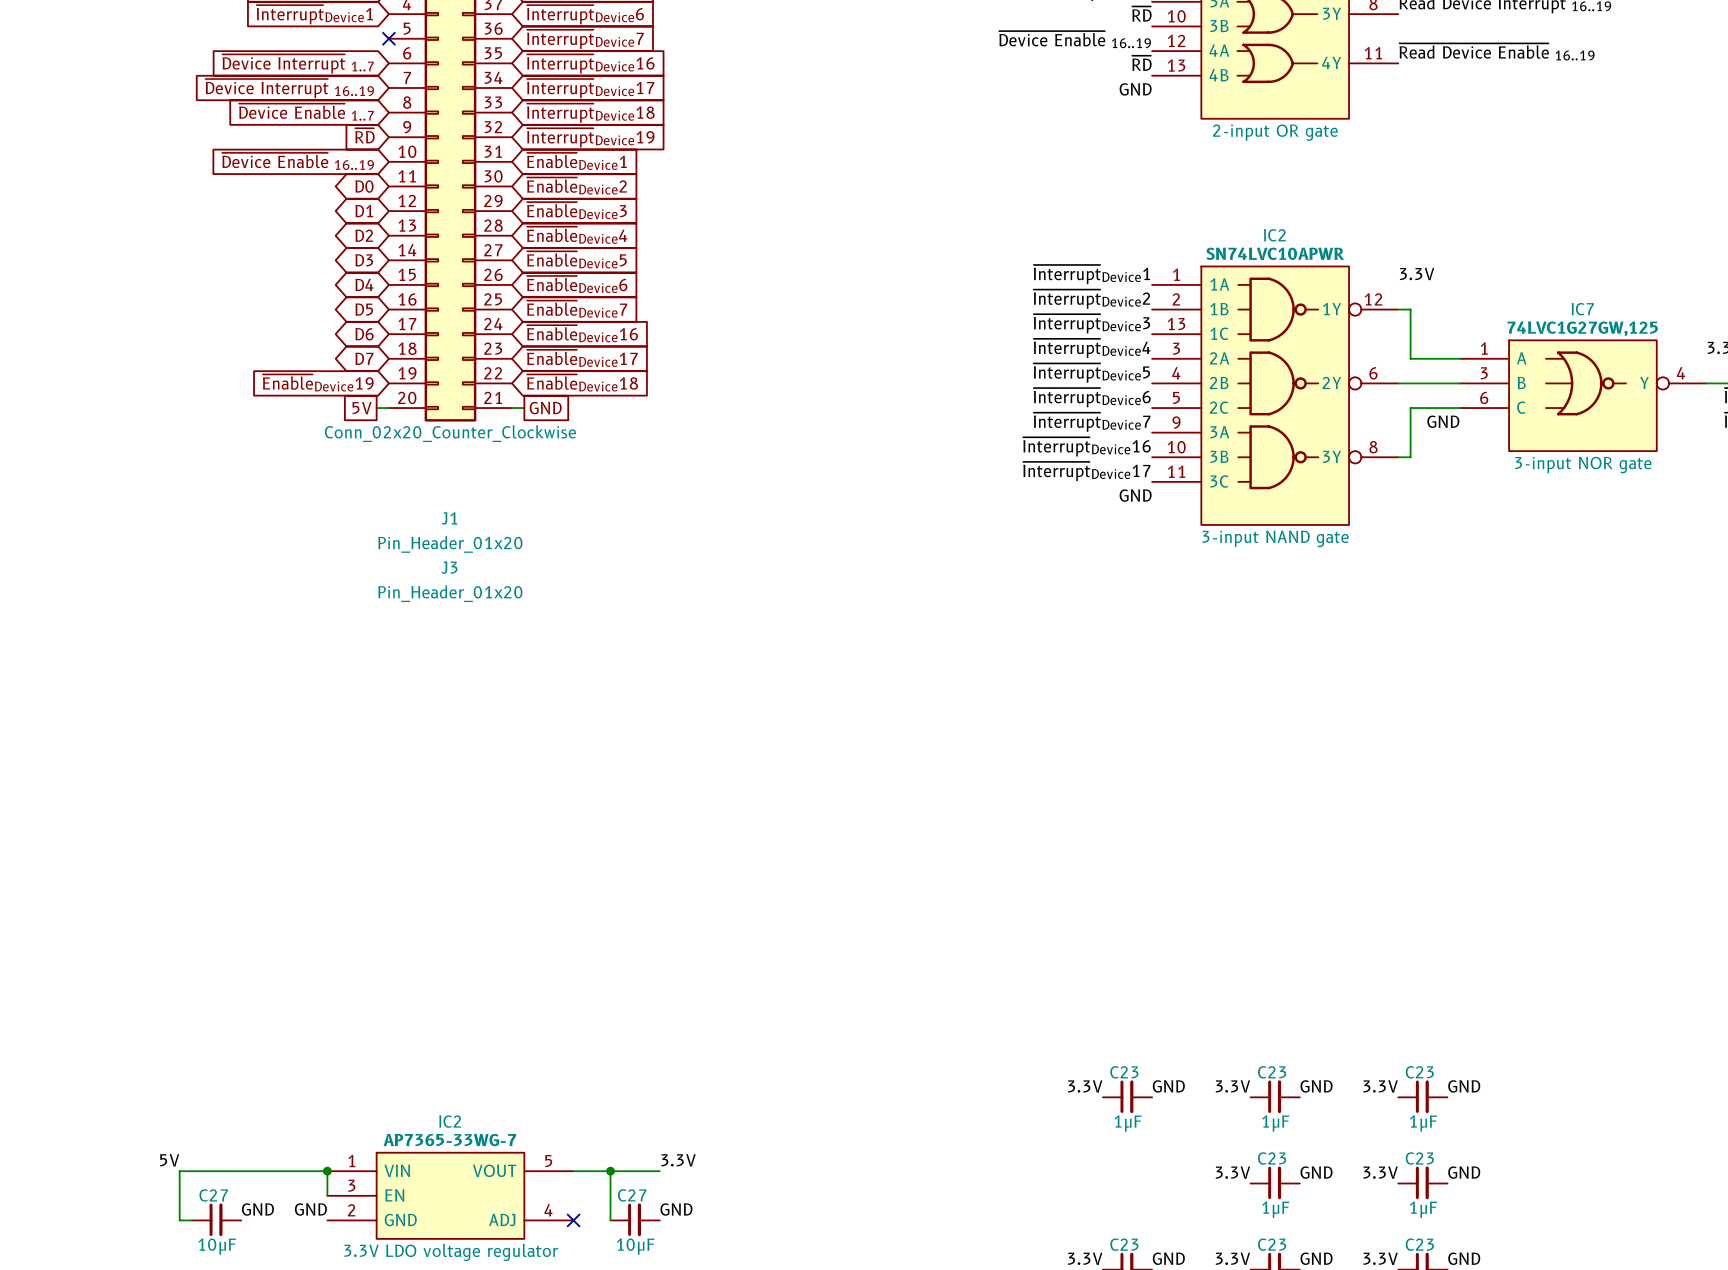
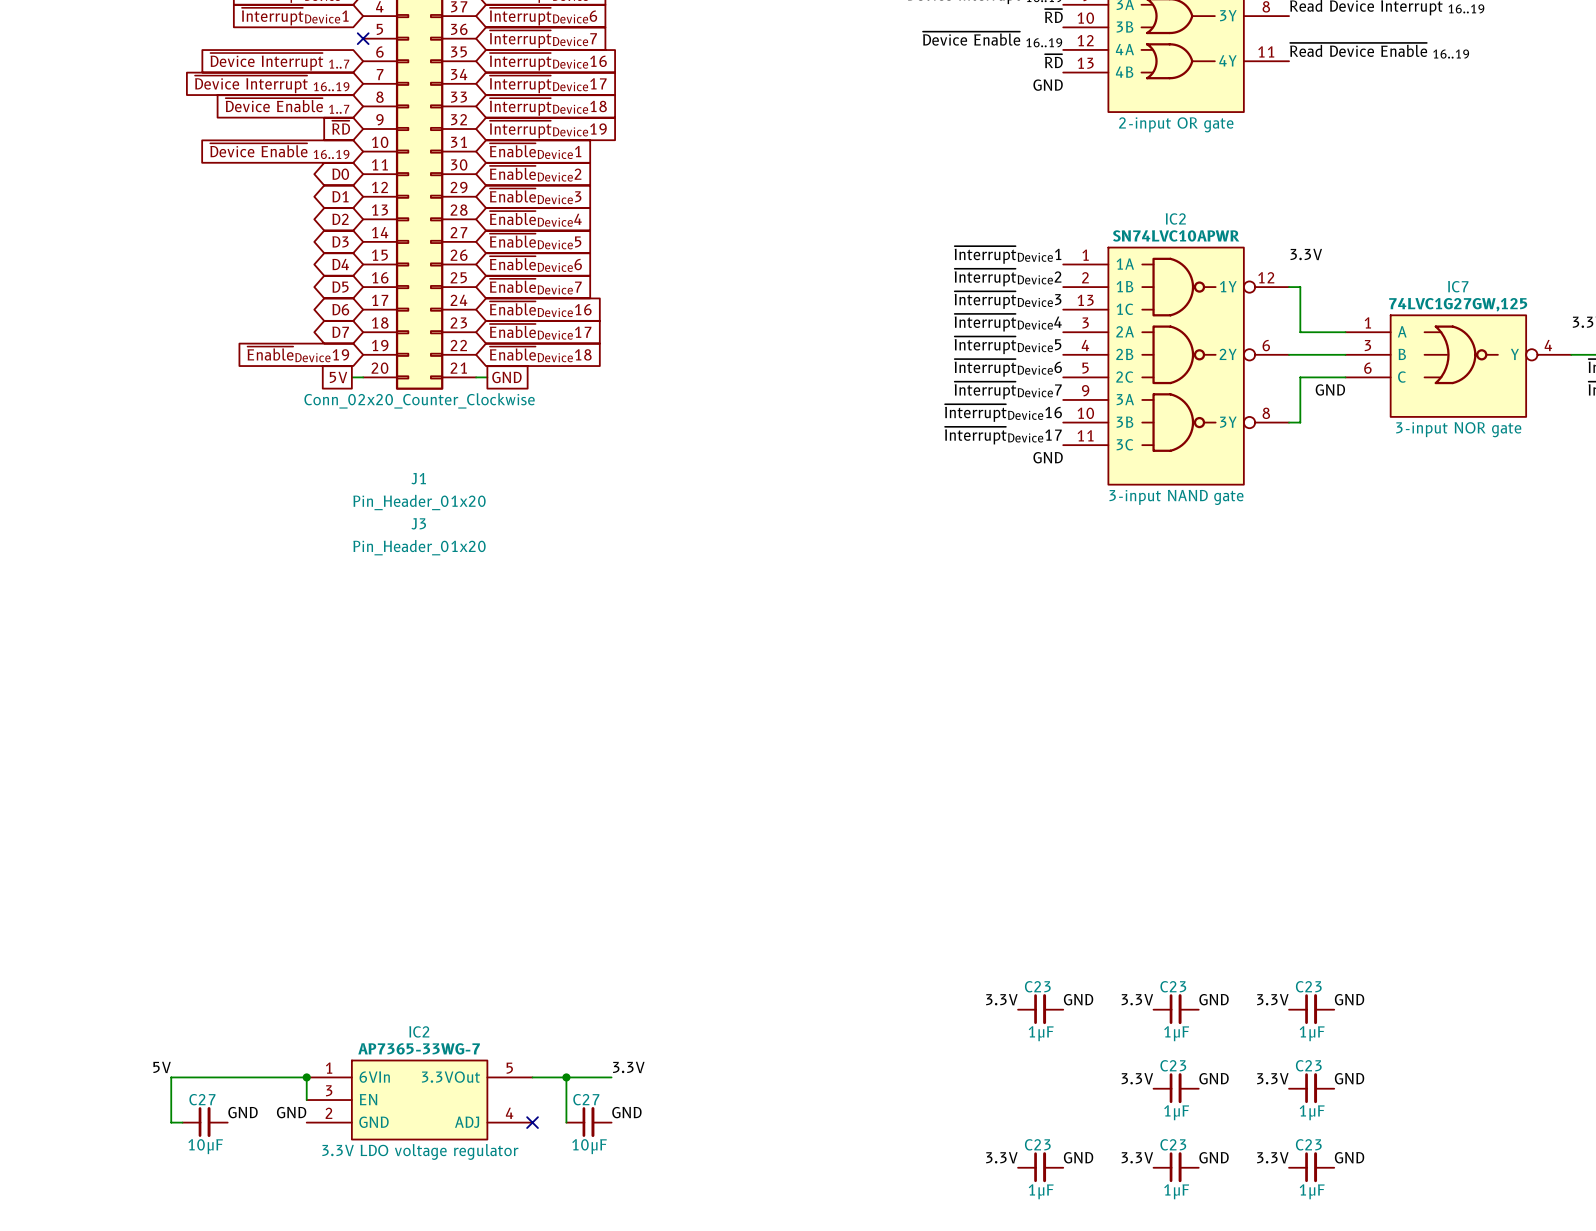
IC2 pin name: VIN (397, 1170) -> 6VIn (374, 1077)
IC2 pin name: VOUT (494, 1170) -> 3.3VOut (450, 1077)

